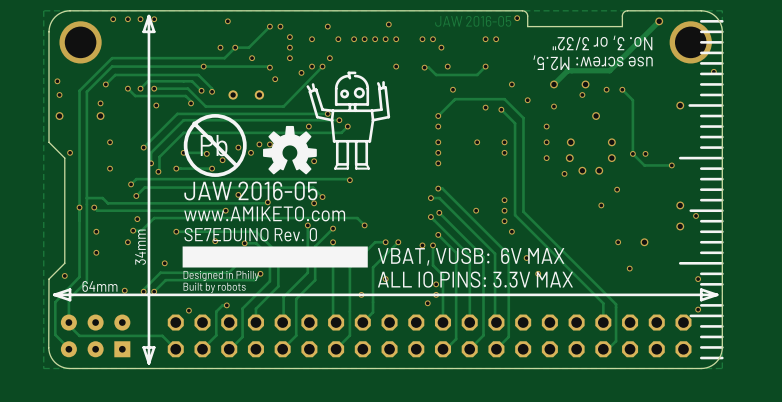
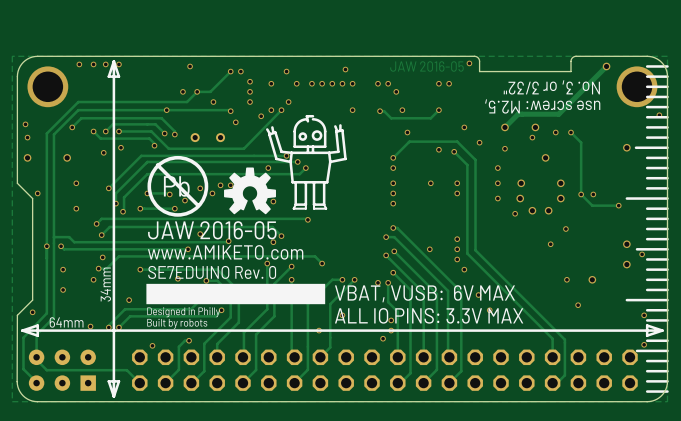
via position: (100, 103) -> (103, 152)

